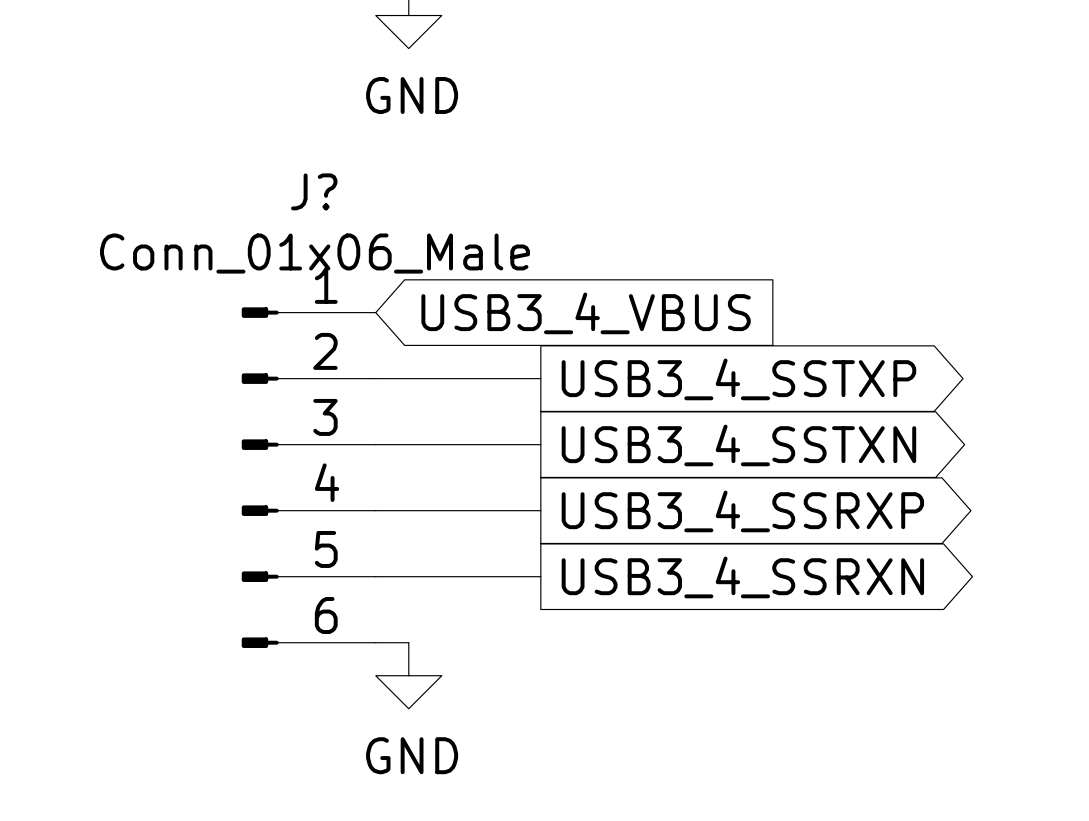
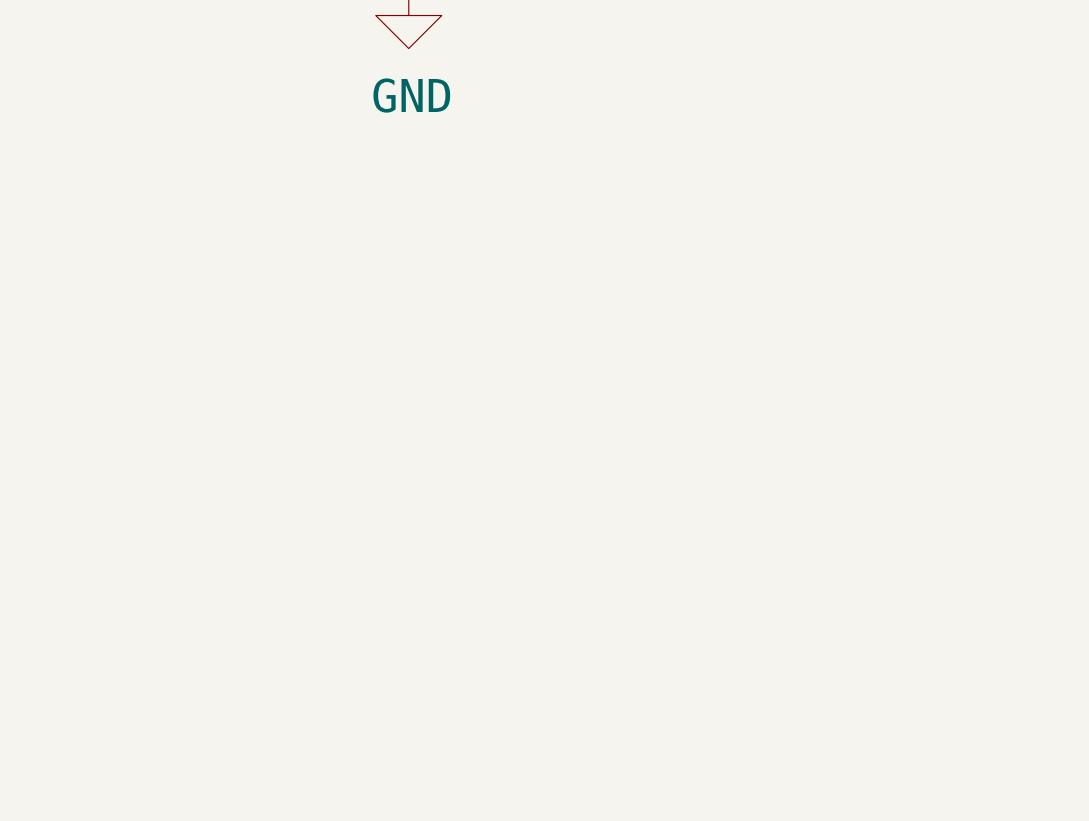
global label: USB3_4_VBUS (586, 313) -> none
wire: (375, 378) (540, 378) -> none
global label: USB3_4_SSTXP (738, 379) -> none
wire: (375, 444) (540, 444) -> none
global label: USB3_4_SSTXN (738, 445) -> none
J?: Conn_01x06_Male (308, 477) -> none
wire: (375, 510) (540, 510) -> none
global label: USB3_4_SSRXP (742, 511) -> none
wire: (375, 576) (540, 576) -> none
global label: USB3_4_SSRXN (742, 577) -> none
wire: (375, 642) (408, 642) -> none
power symbol: GND (408, 675) -> none

